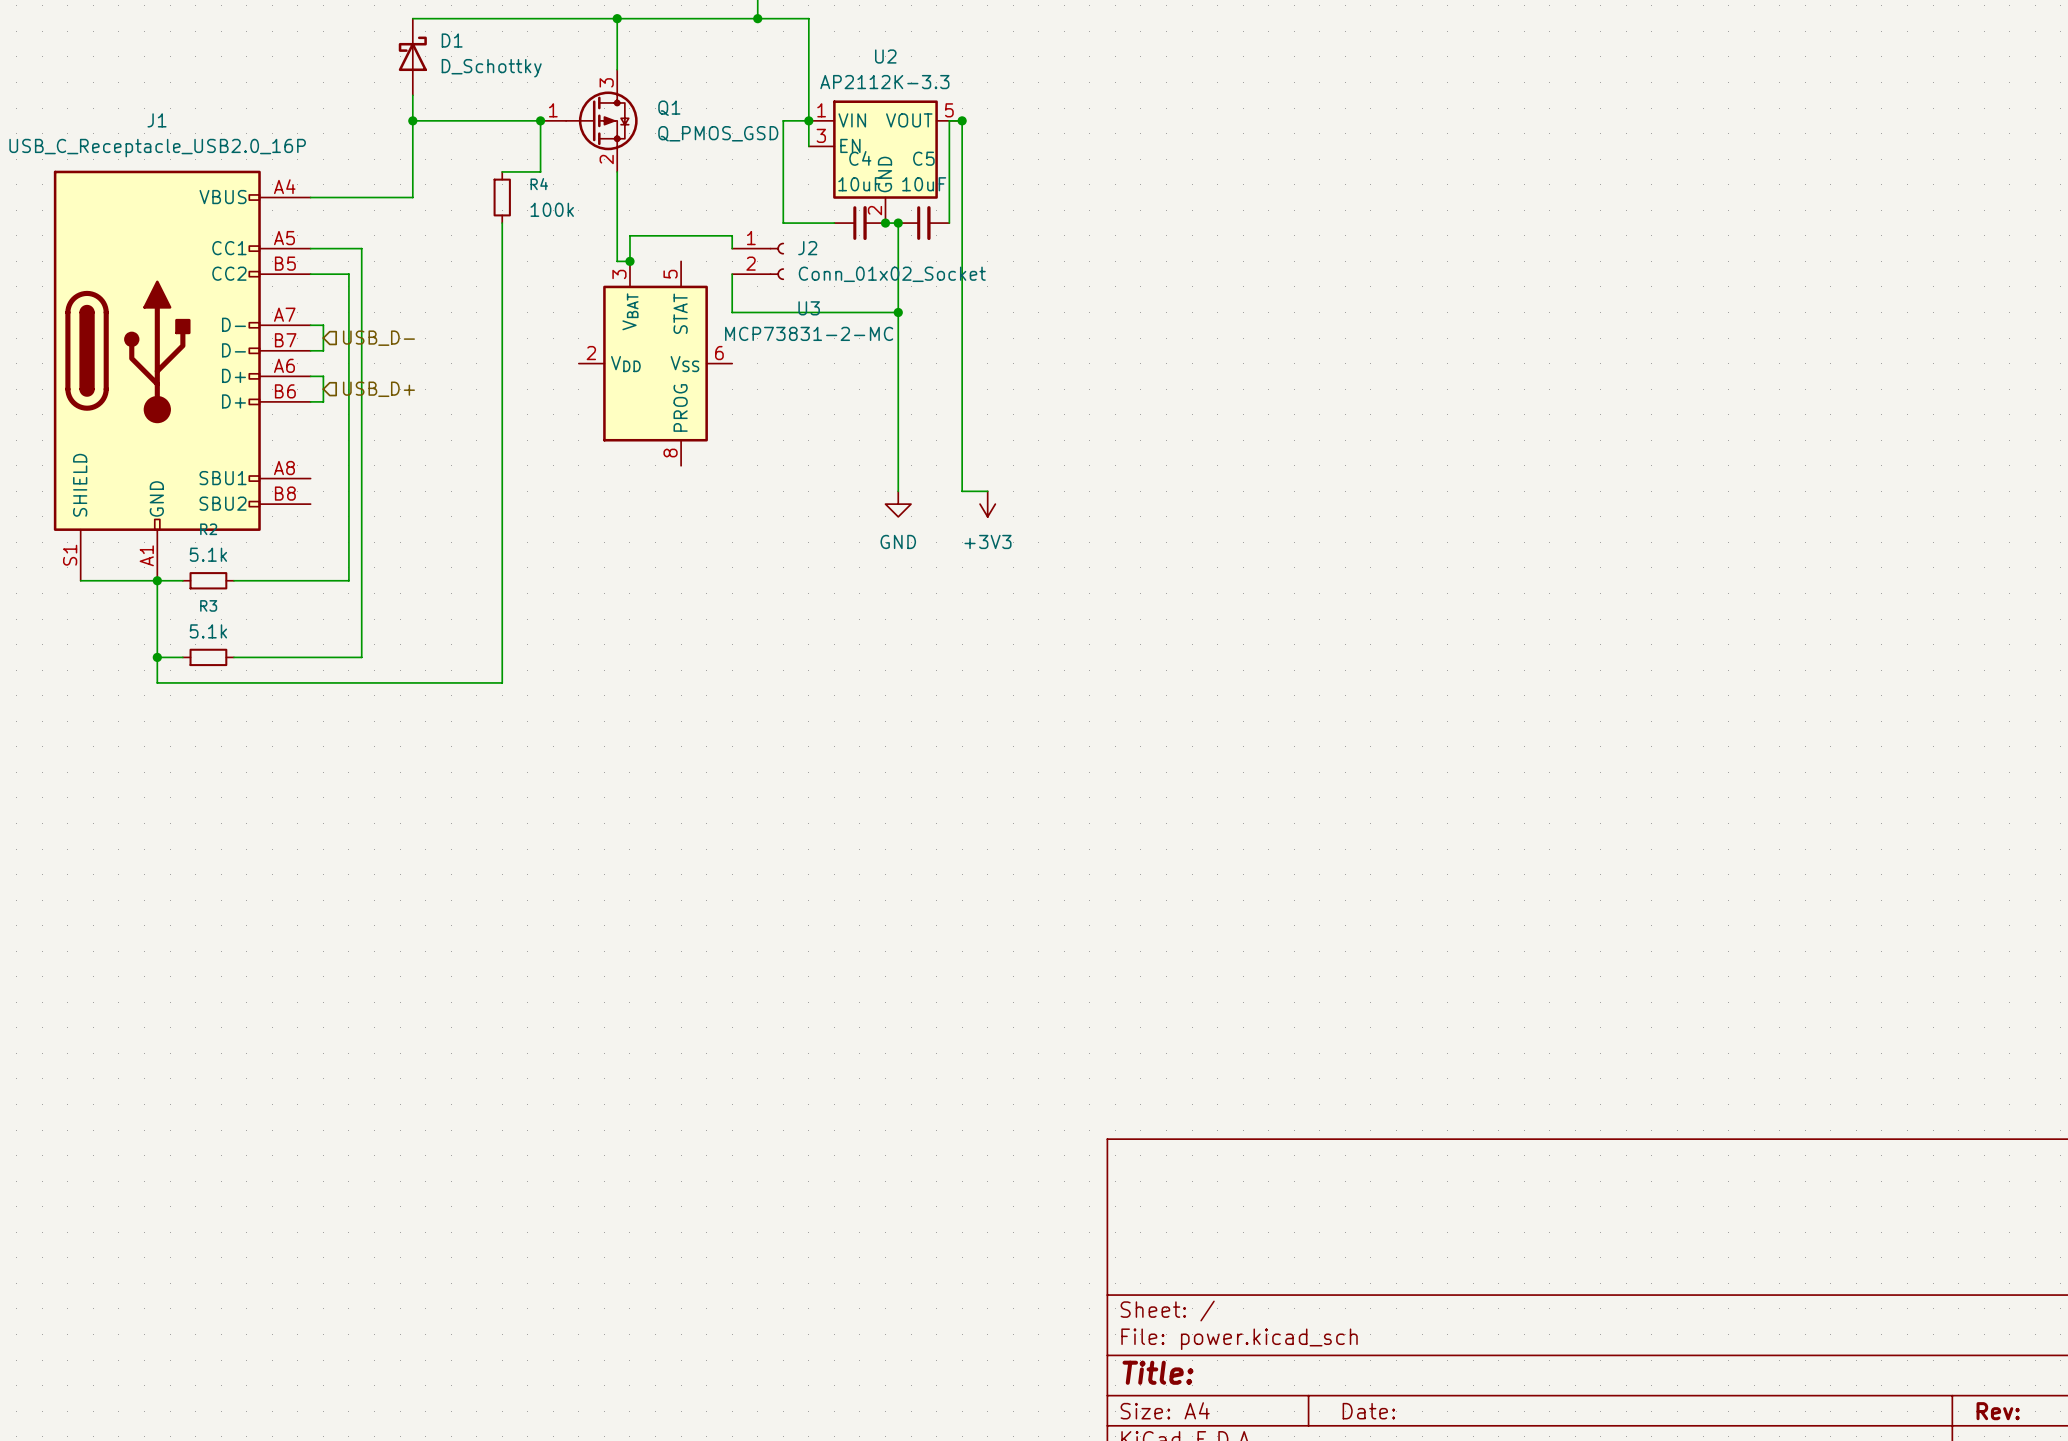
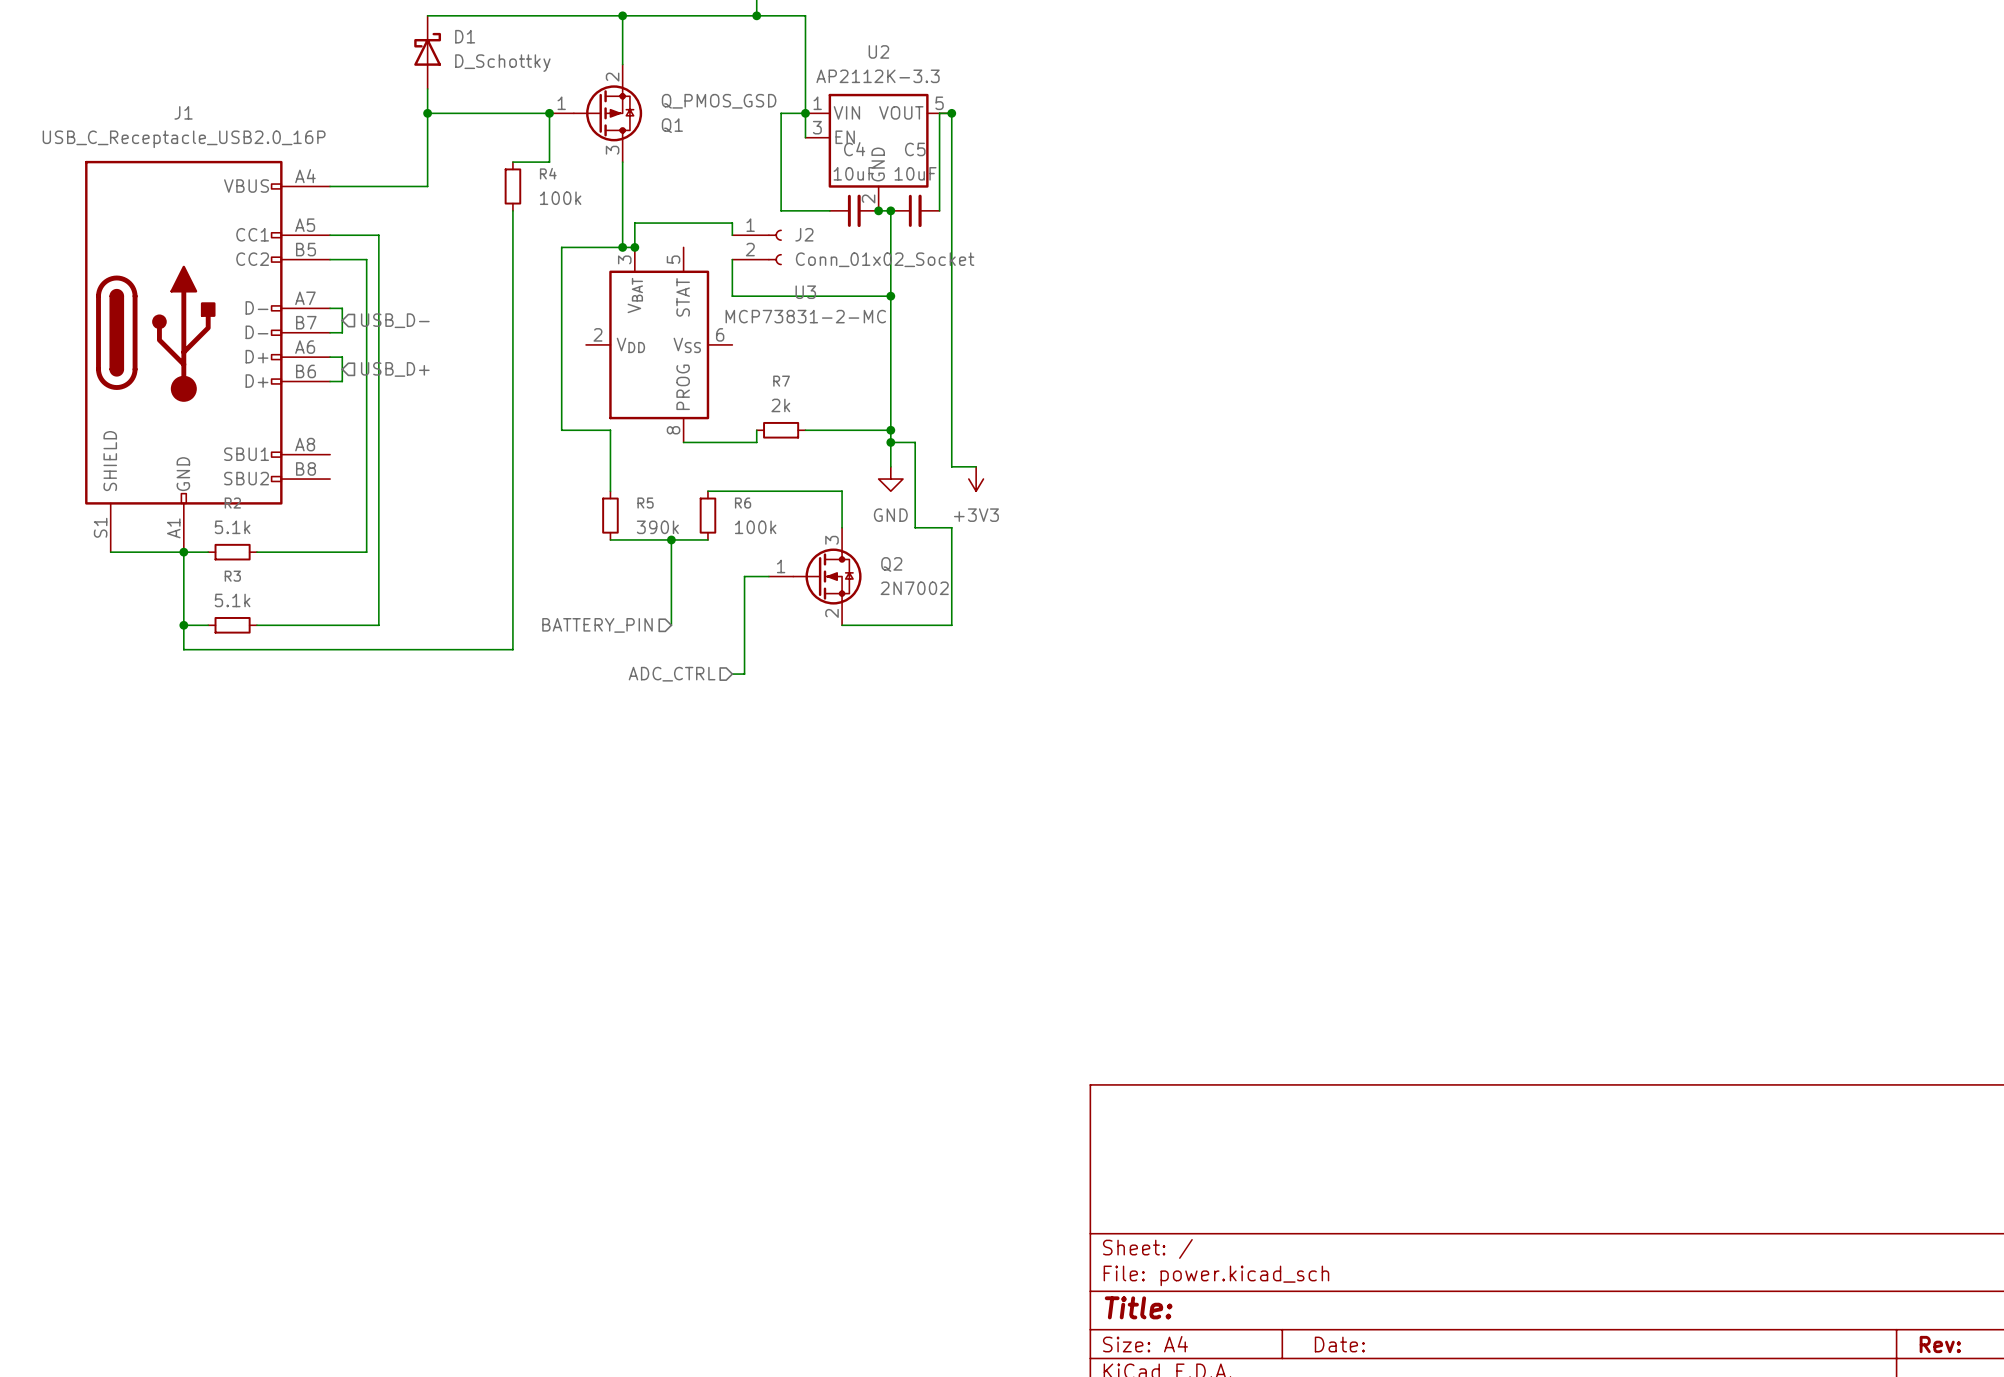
Q1 flip: as is (601, 120) -> up-down (608, 113)
wire: none -> (622, 247) (561, 247) (561, 430) (610, 430) (610, 491)
junction: none -> (622, 247)
wire: none -> (756, 430) (756, 442) (683, 442)
R7: none -> 2k (781, 430)
wire: none -> (805, 430) (890, 430)
junction: none -> (890, 430)
wire: none -> (890, 442) (915, 442) (915, 527) (951, 527) (951, 625) (842, 625)
junction: none -> (890, 442)
wire: none -> (707, 491) (842, 491) (842, 527)
R5: none -> 390k (610, 515)
R6: none -> 100k (707, 515)
wire: none -> (610, 539) (707, 539)
wire: none -> (671, 539) (671, 625)
junction: none -> (671, 539)
wire: none -> (768, 576) (744, 576) (744, 674) (732, 674)
Q2: none -> 2N7002 (815, 576)
hierarchical label: none -> BATTERY_PIN (597, 625)
hierarchical label: none -> ADC_CTRL (672, 674)

